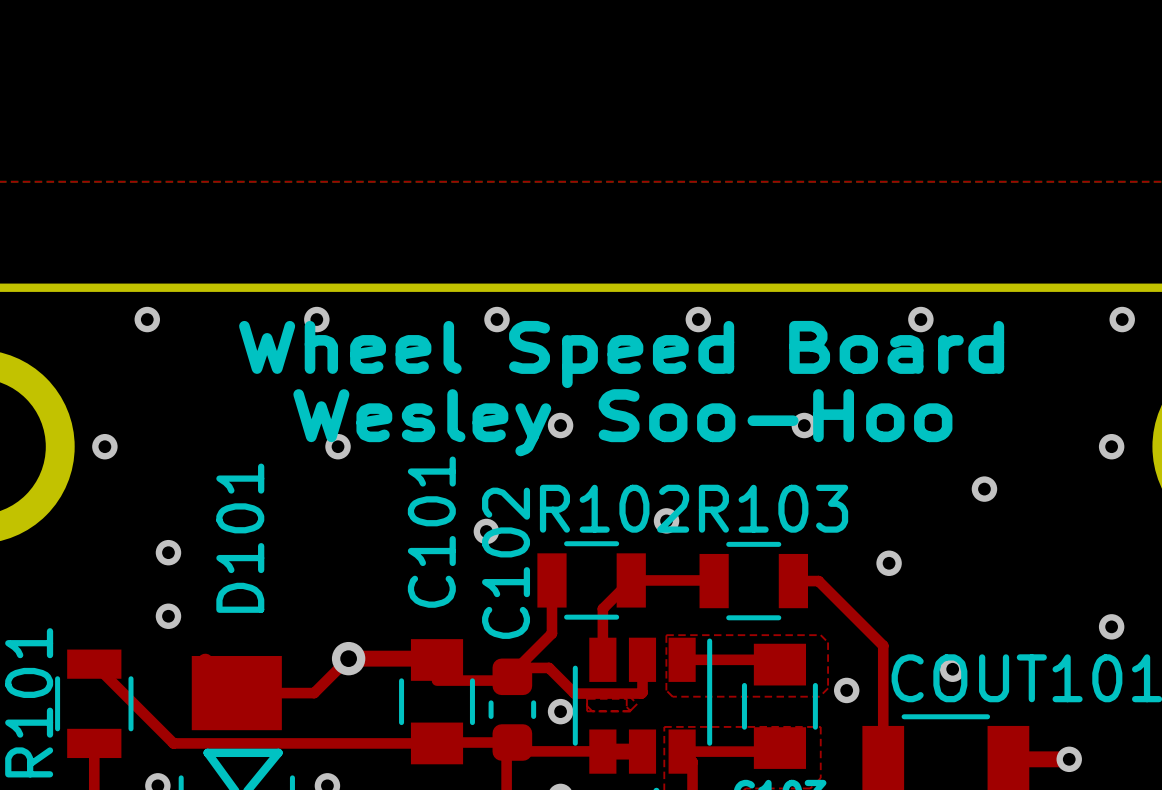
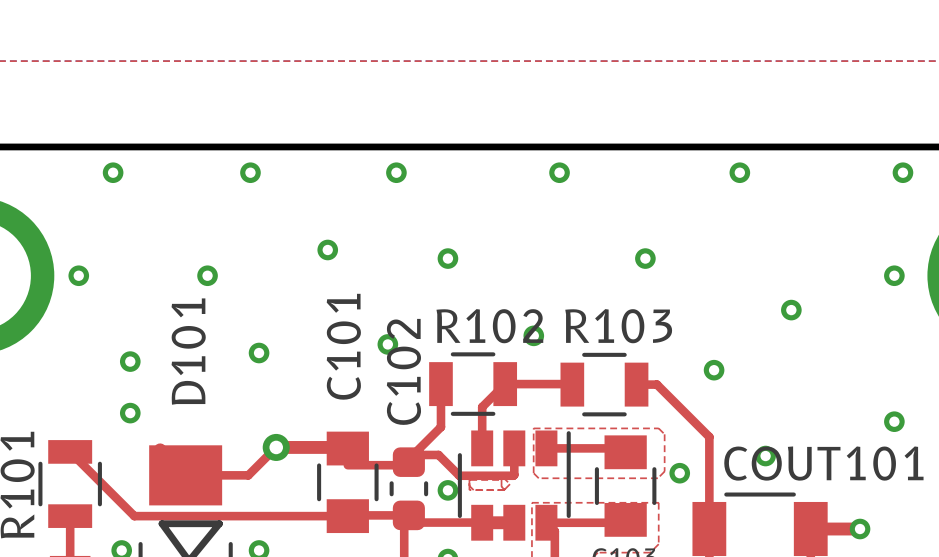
text: Wheel Speed Board (621, 354) -> none
via: none -> (327, 249)
text: Wesley Soo-Hoo (622, 422) -> none
via: none -> (207, 275)
via: (338, 446) -> none
via: none -> (259, 353)

